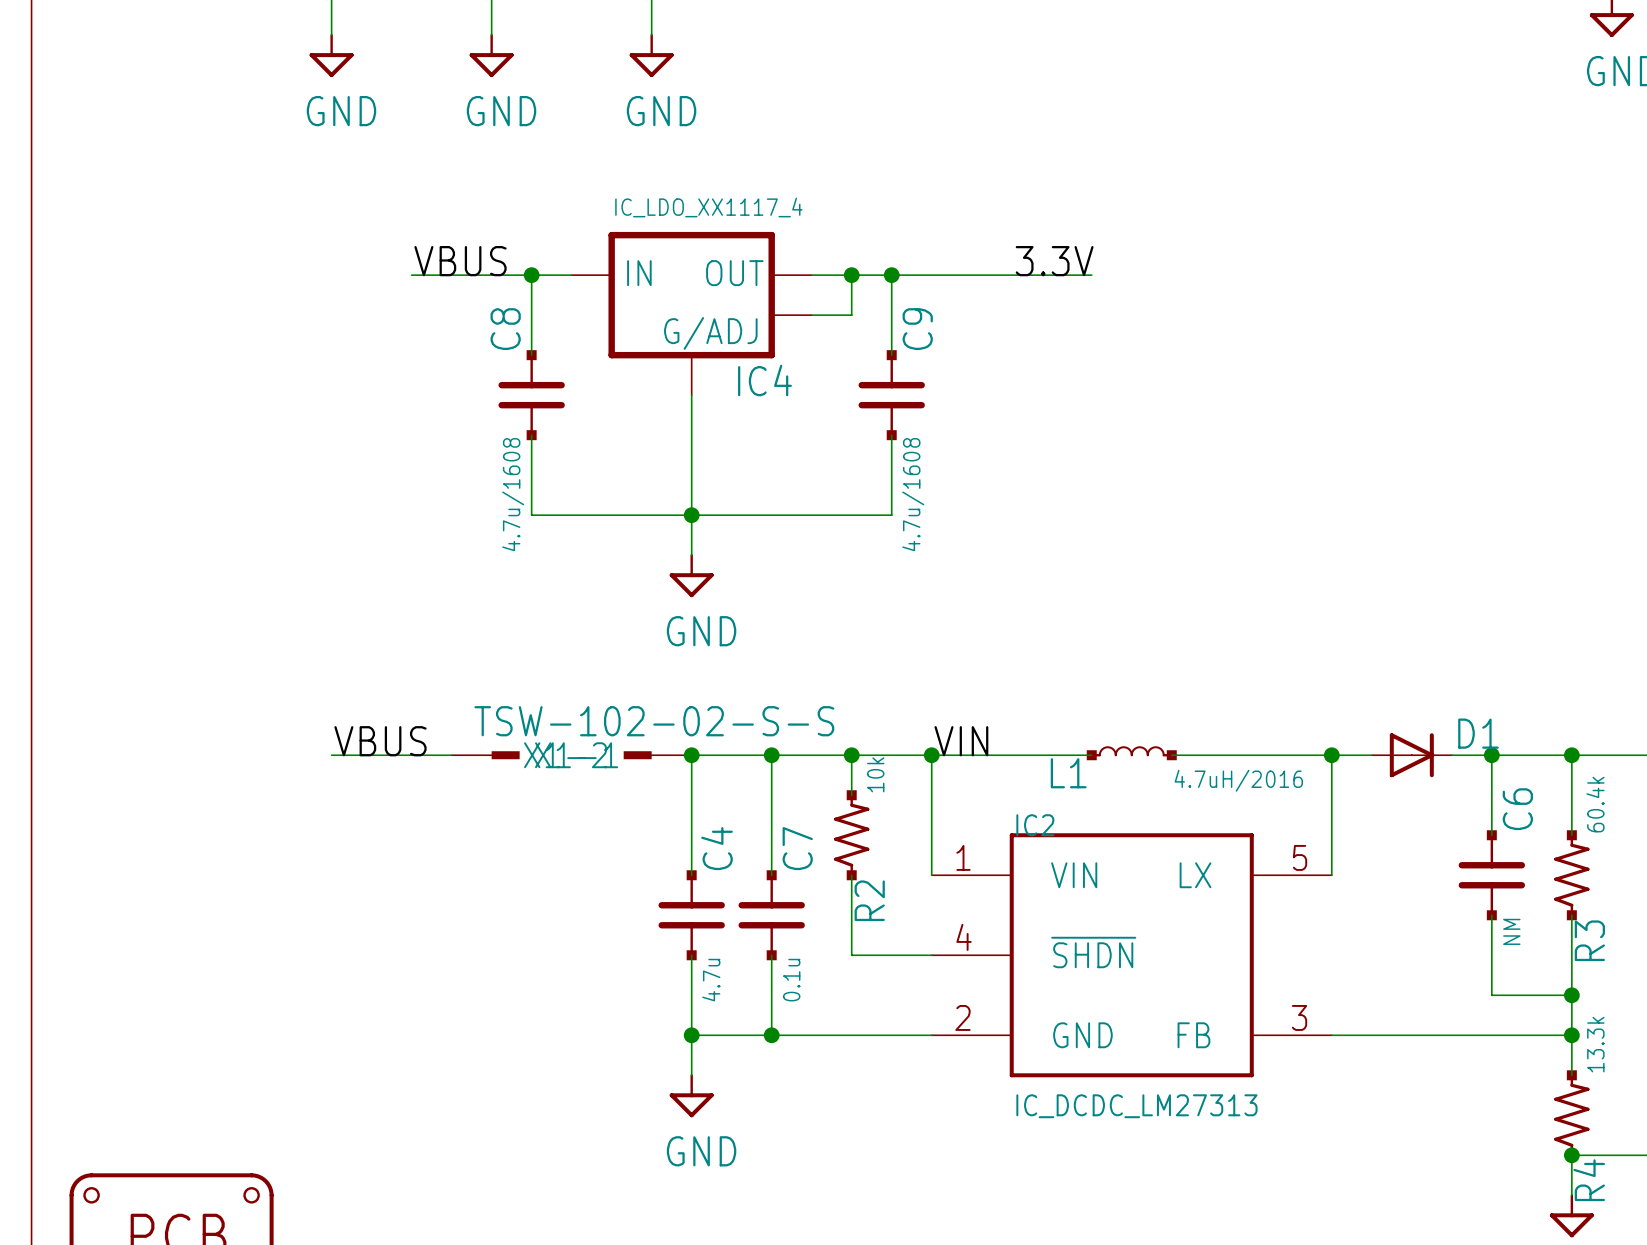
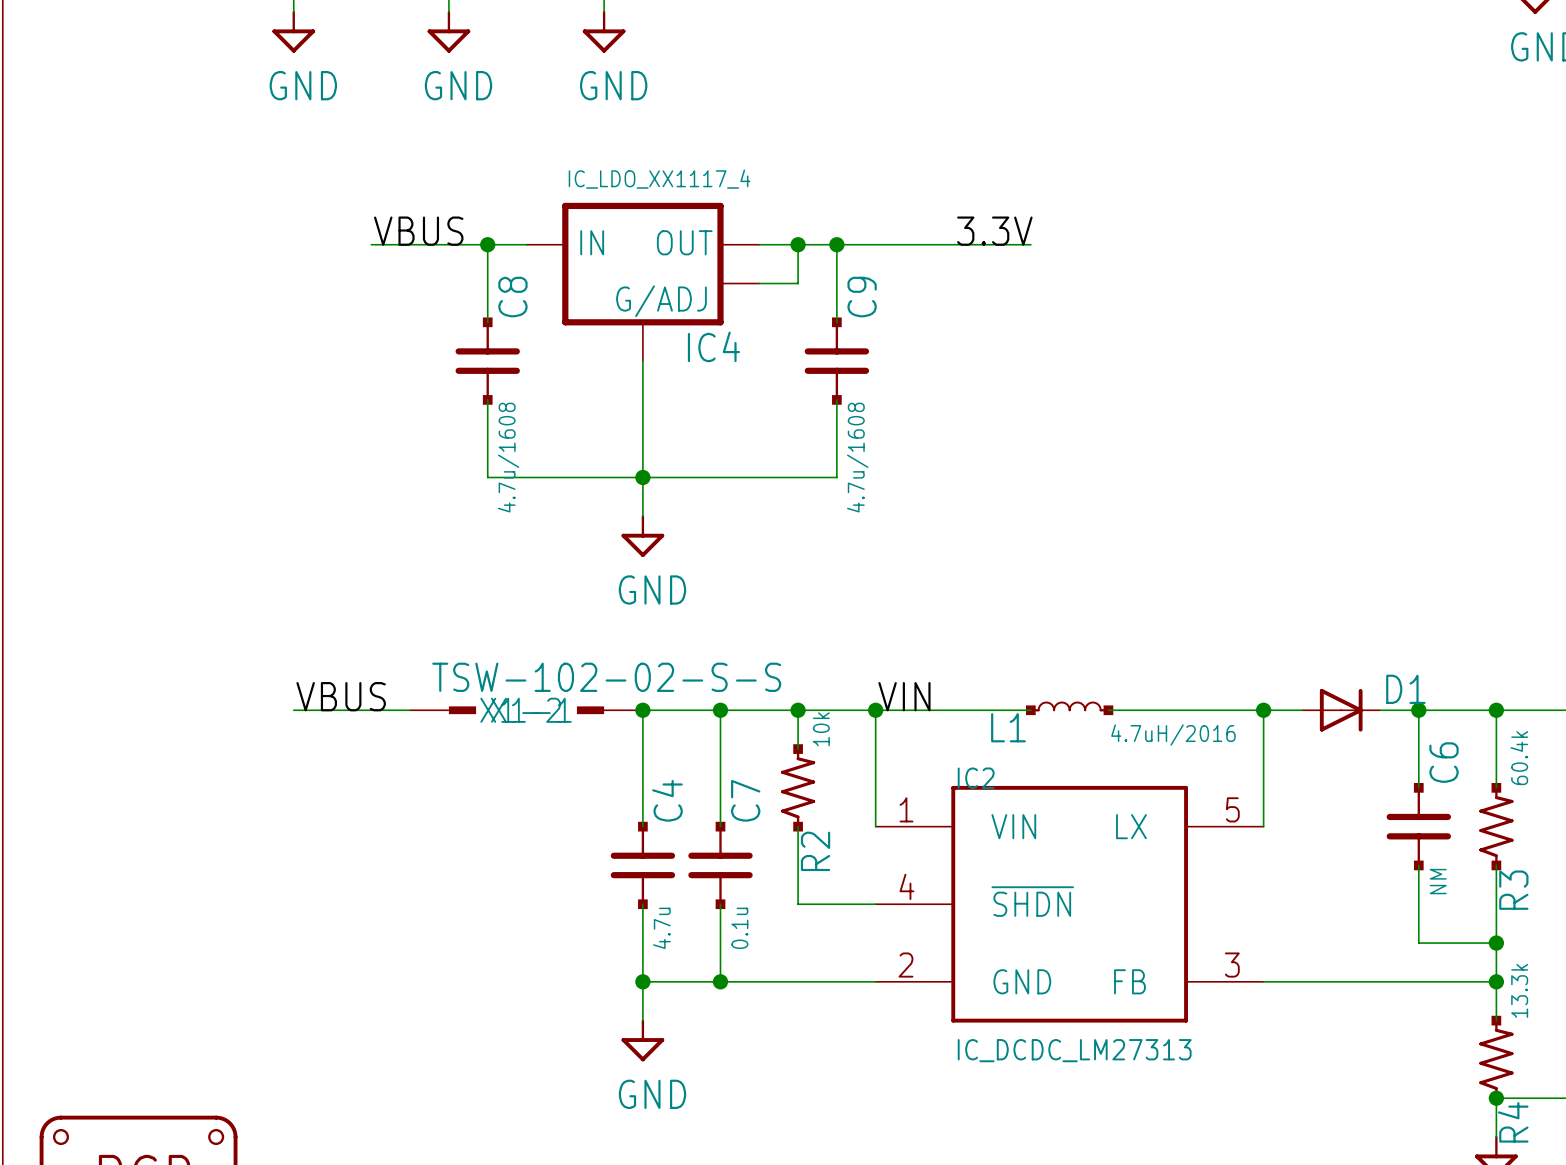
C8 name position: C8 (505, 329) -> C8 (512, 297)
C8 value position: 4.7u/1608 (513, 494) -> 4.7u/1608 (508, 457)

